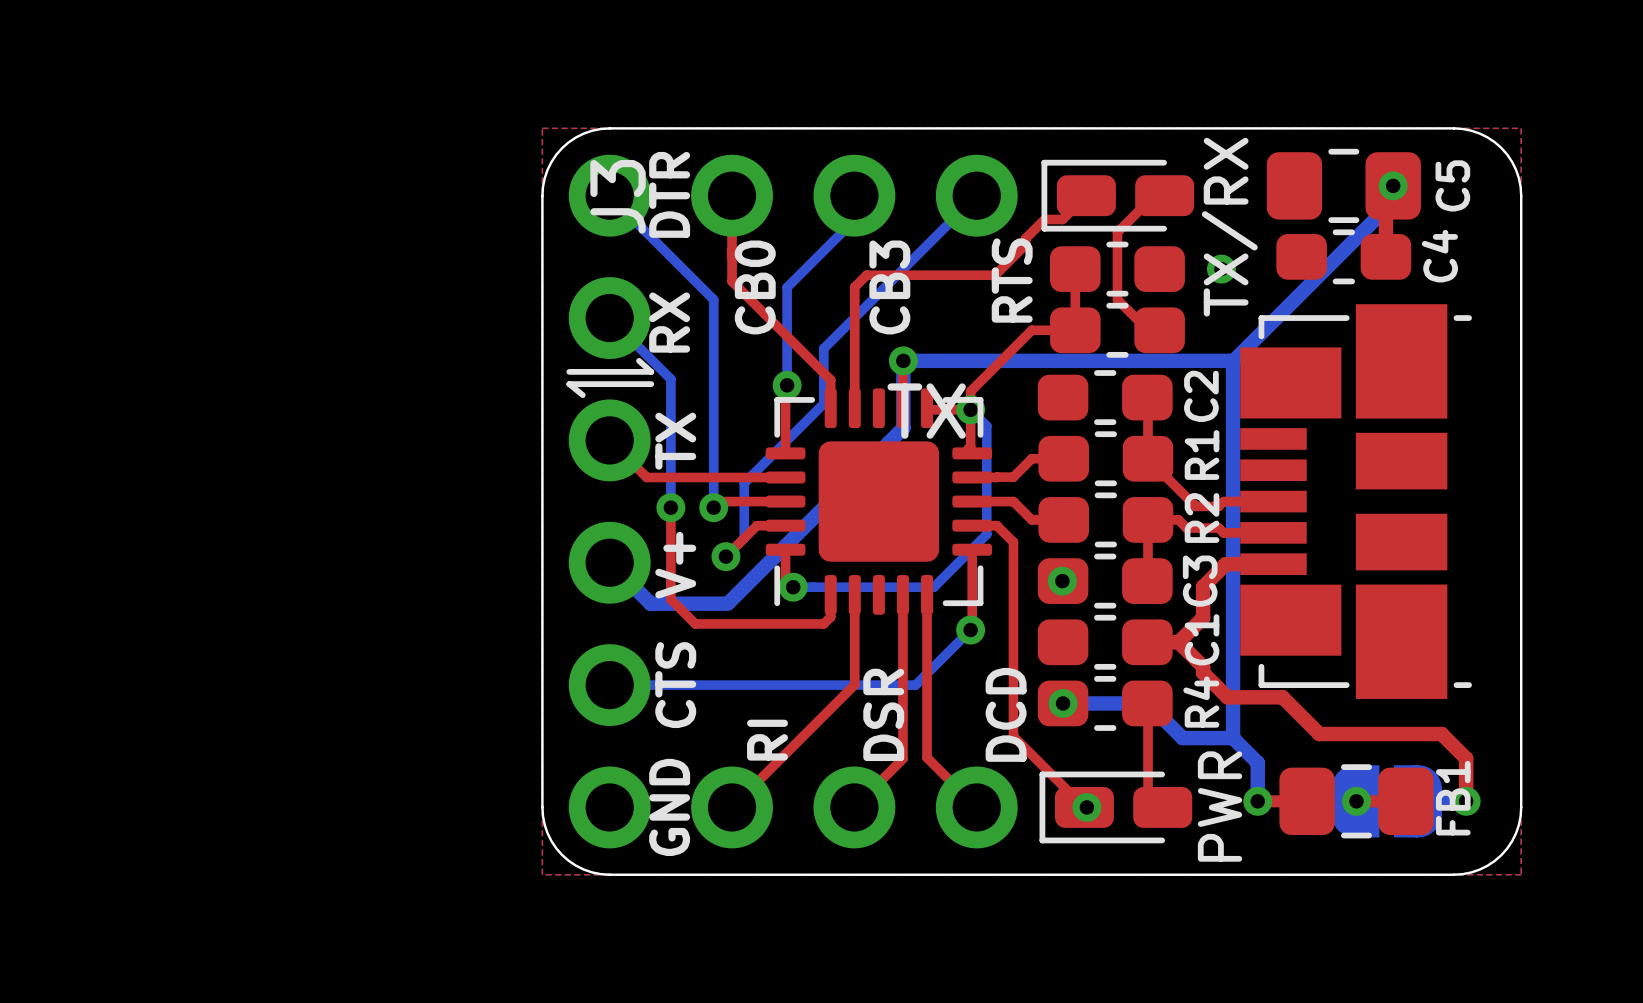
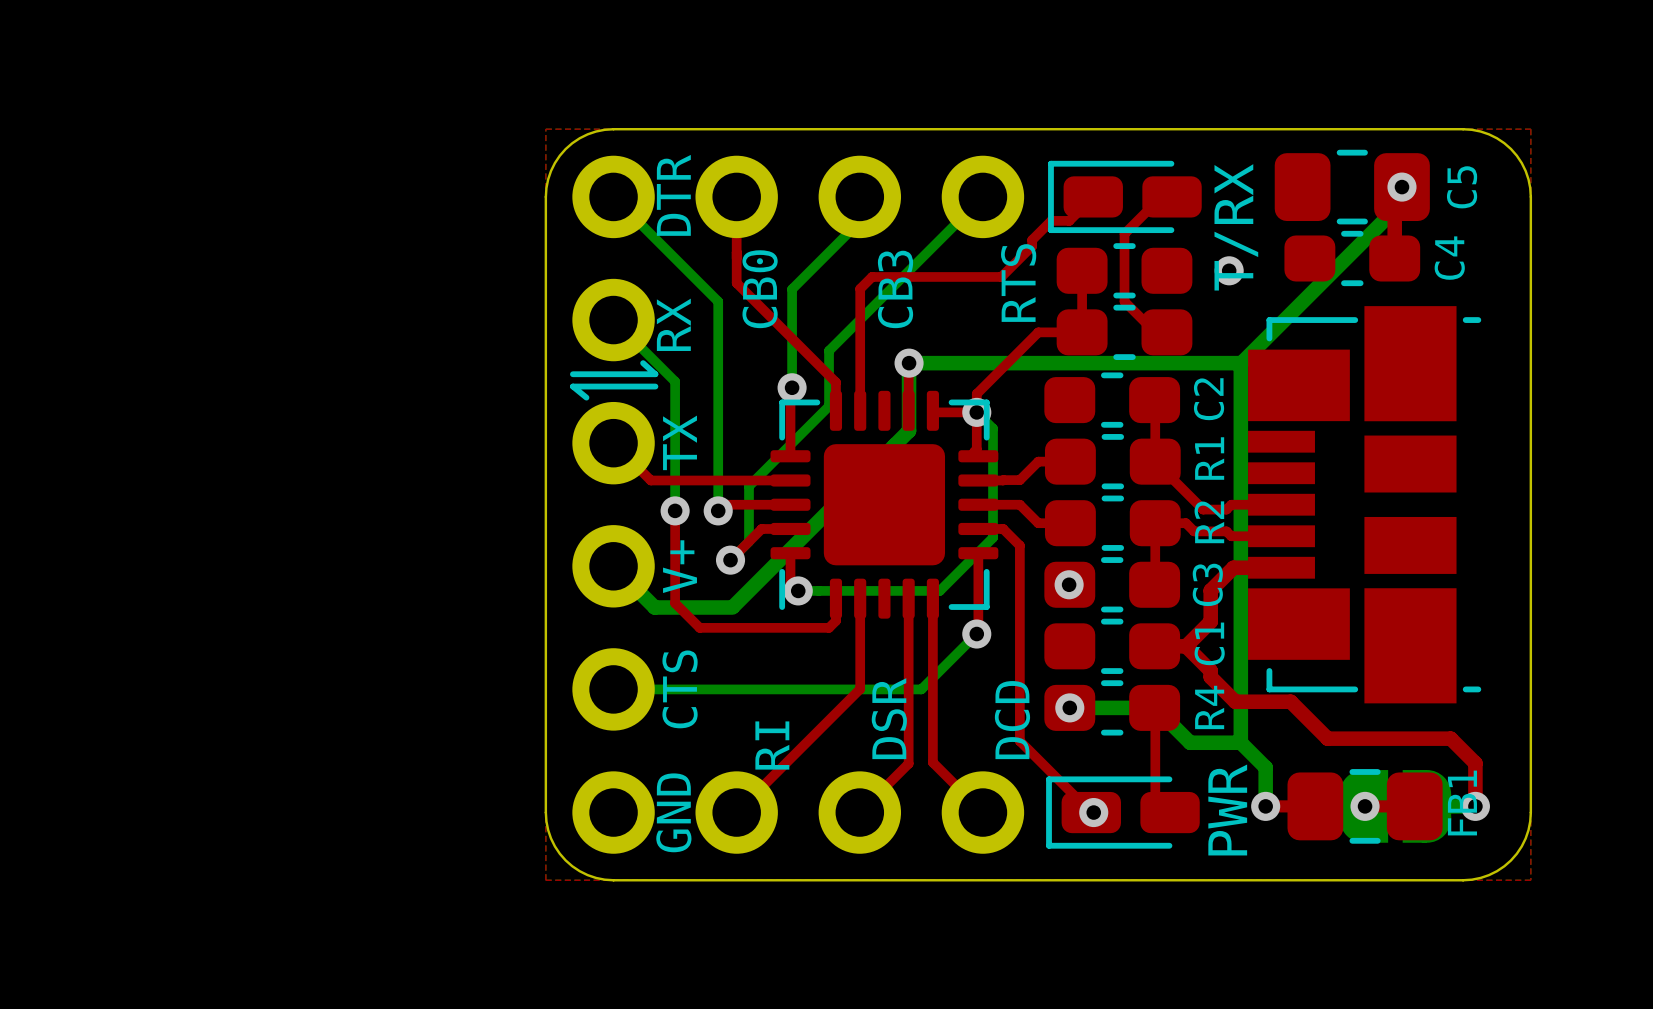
J3 name: J3 (618, 196) -> none
TX/RX name: TX/RX (1229, 227) -> T/RX (1236, 227)
text: TX (926, 411) -> none

